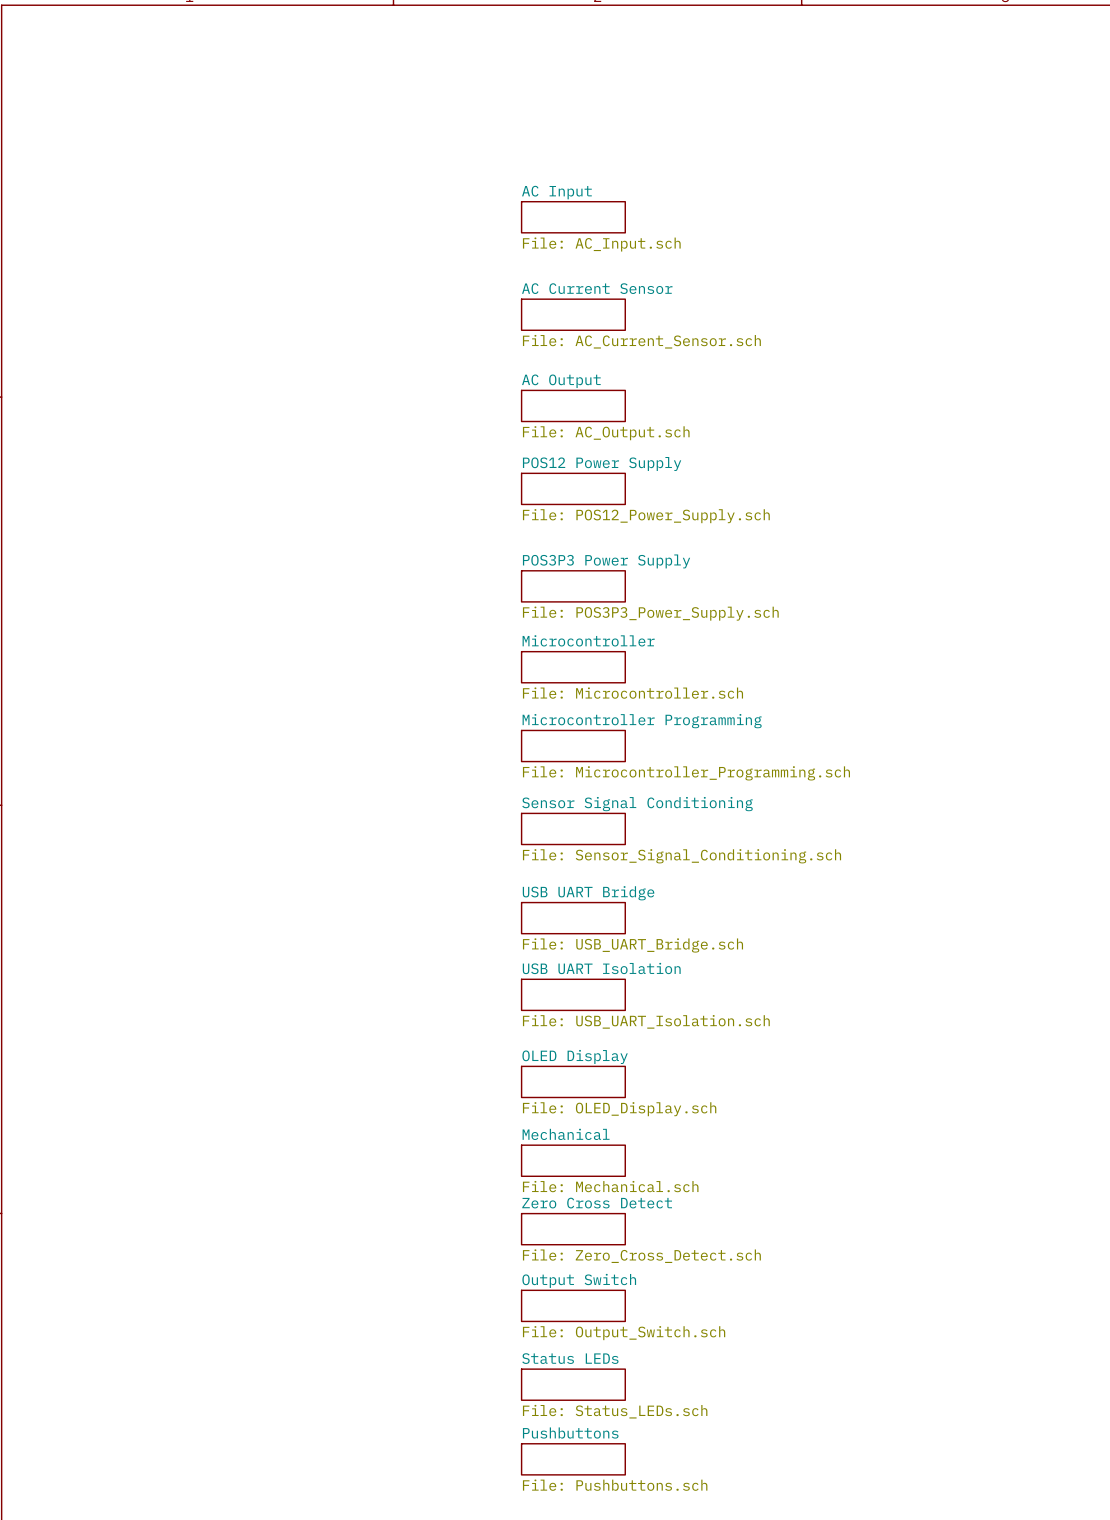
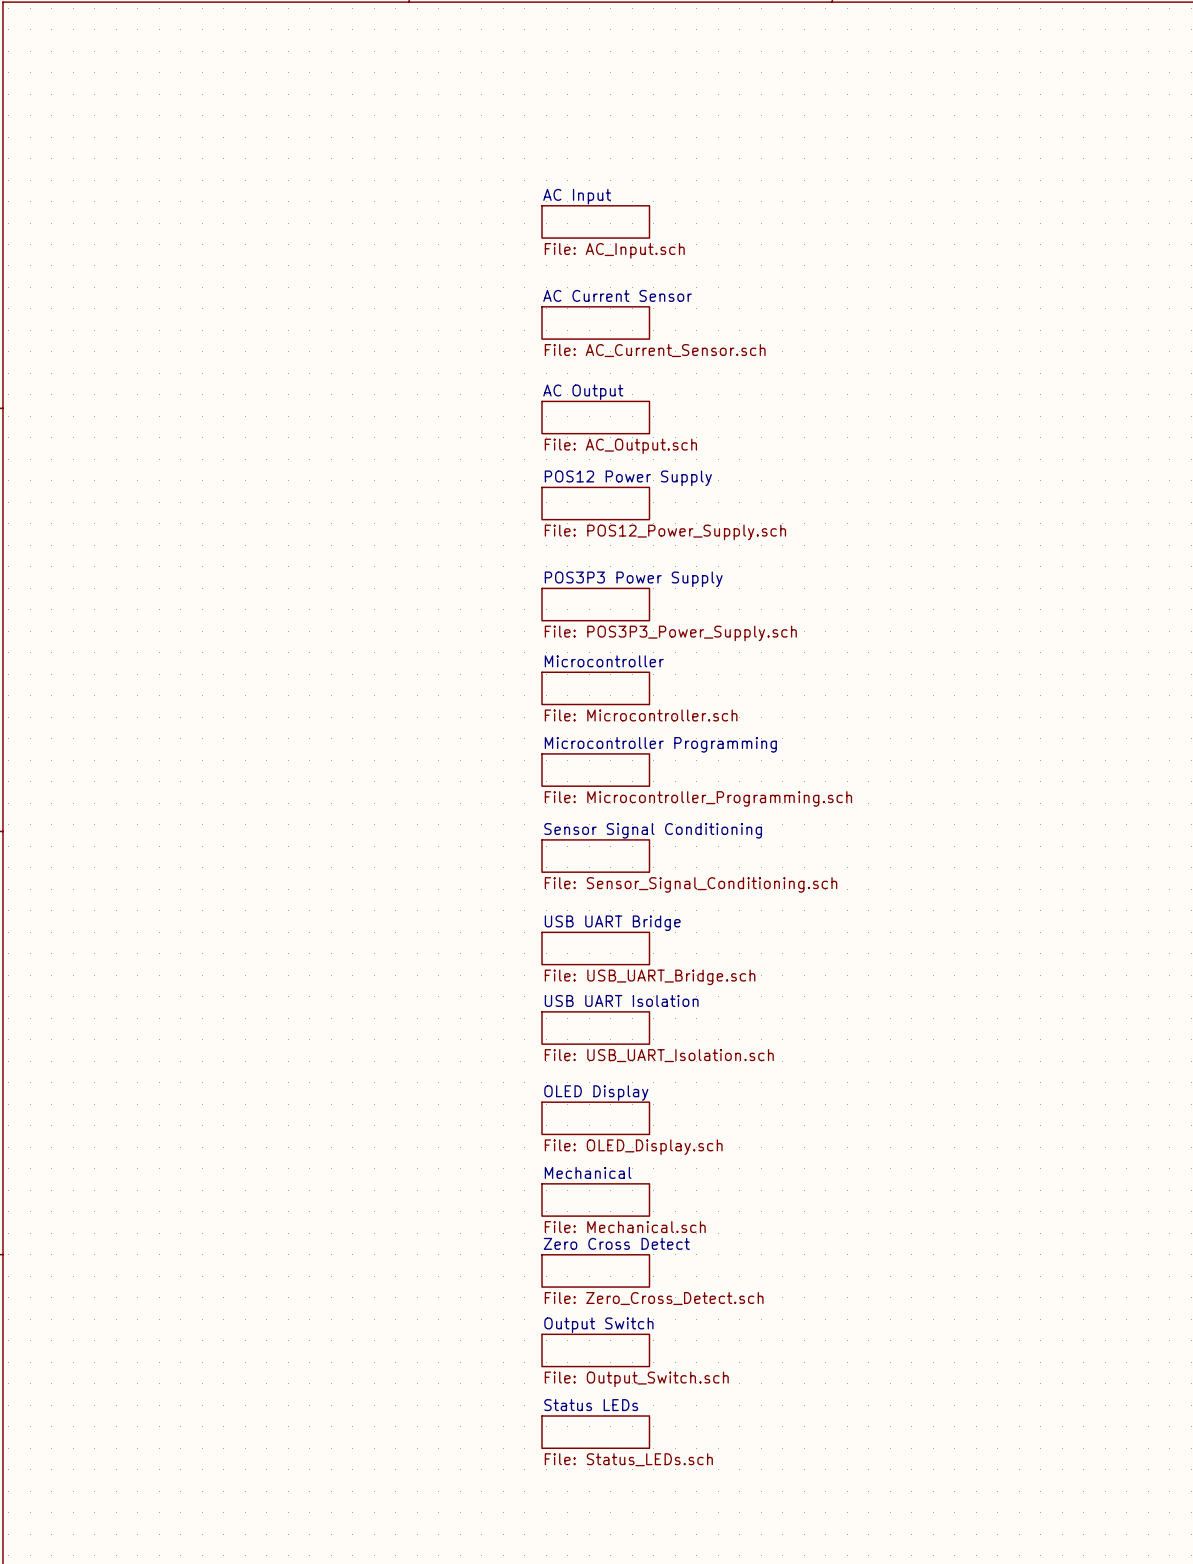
sheet Pushbuttons: File: Pushbuttons.sch (573, 1459) -> none

